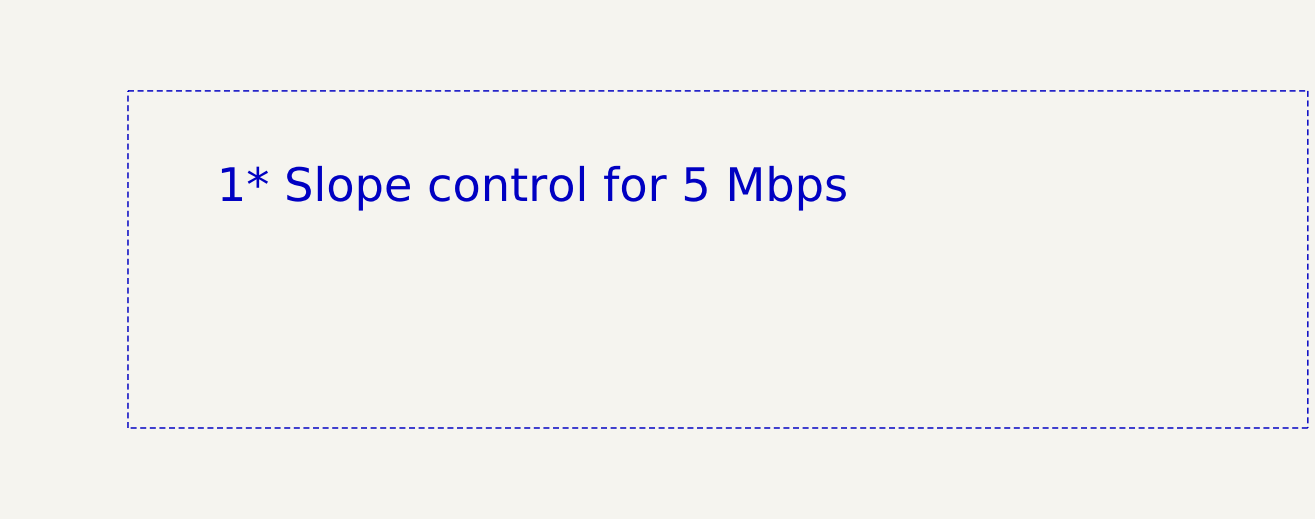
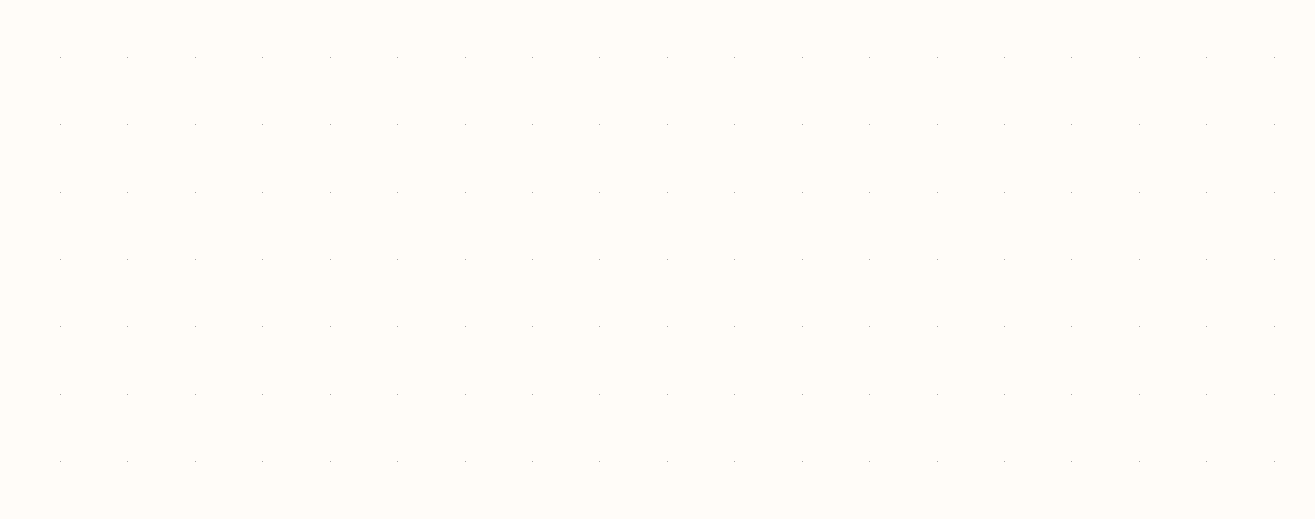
line: (127, 90) (1307, 90) (1307, 427) (127, 427) (127, 90) -> none
text: 1* Slope control for 5 Mbps (533, 188) -> none

